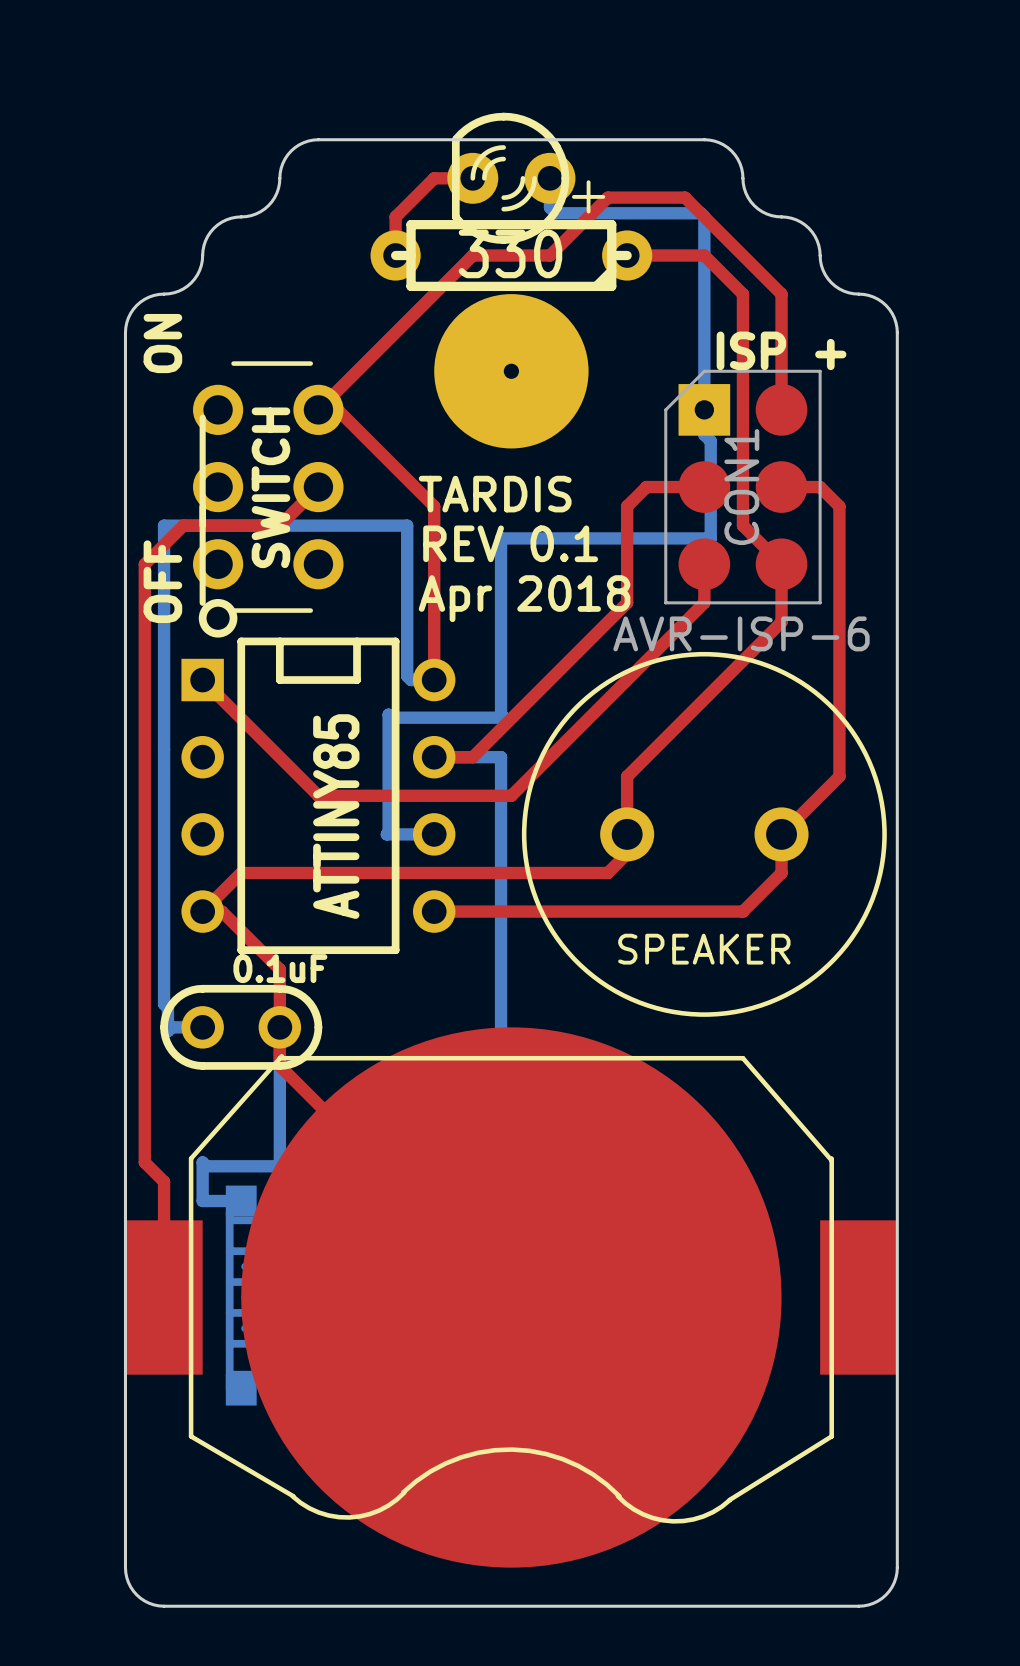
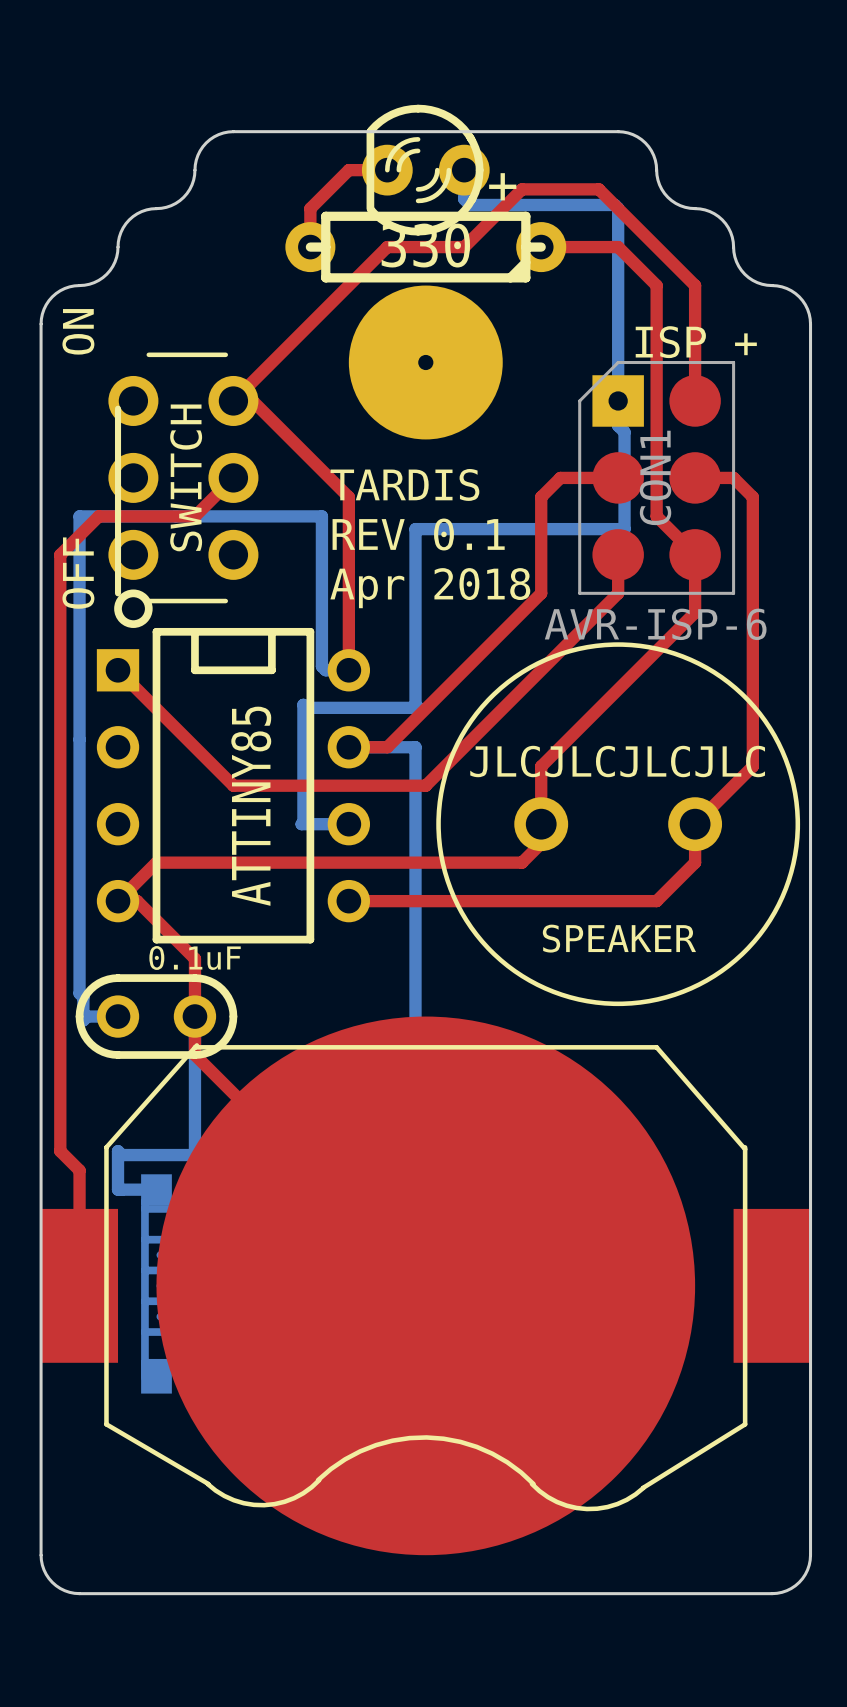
text: none -> JLCJLCJLCJLC (617, 761)

